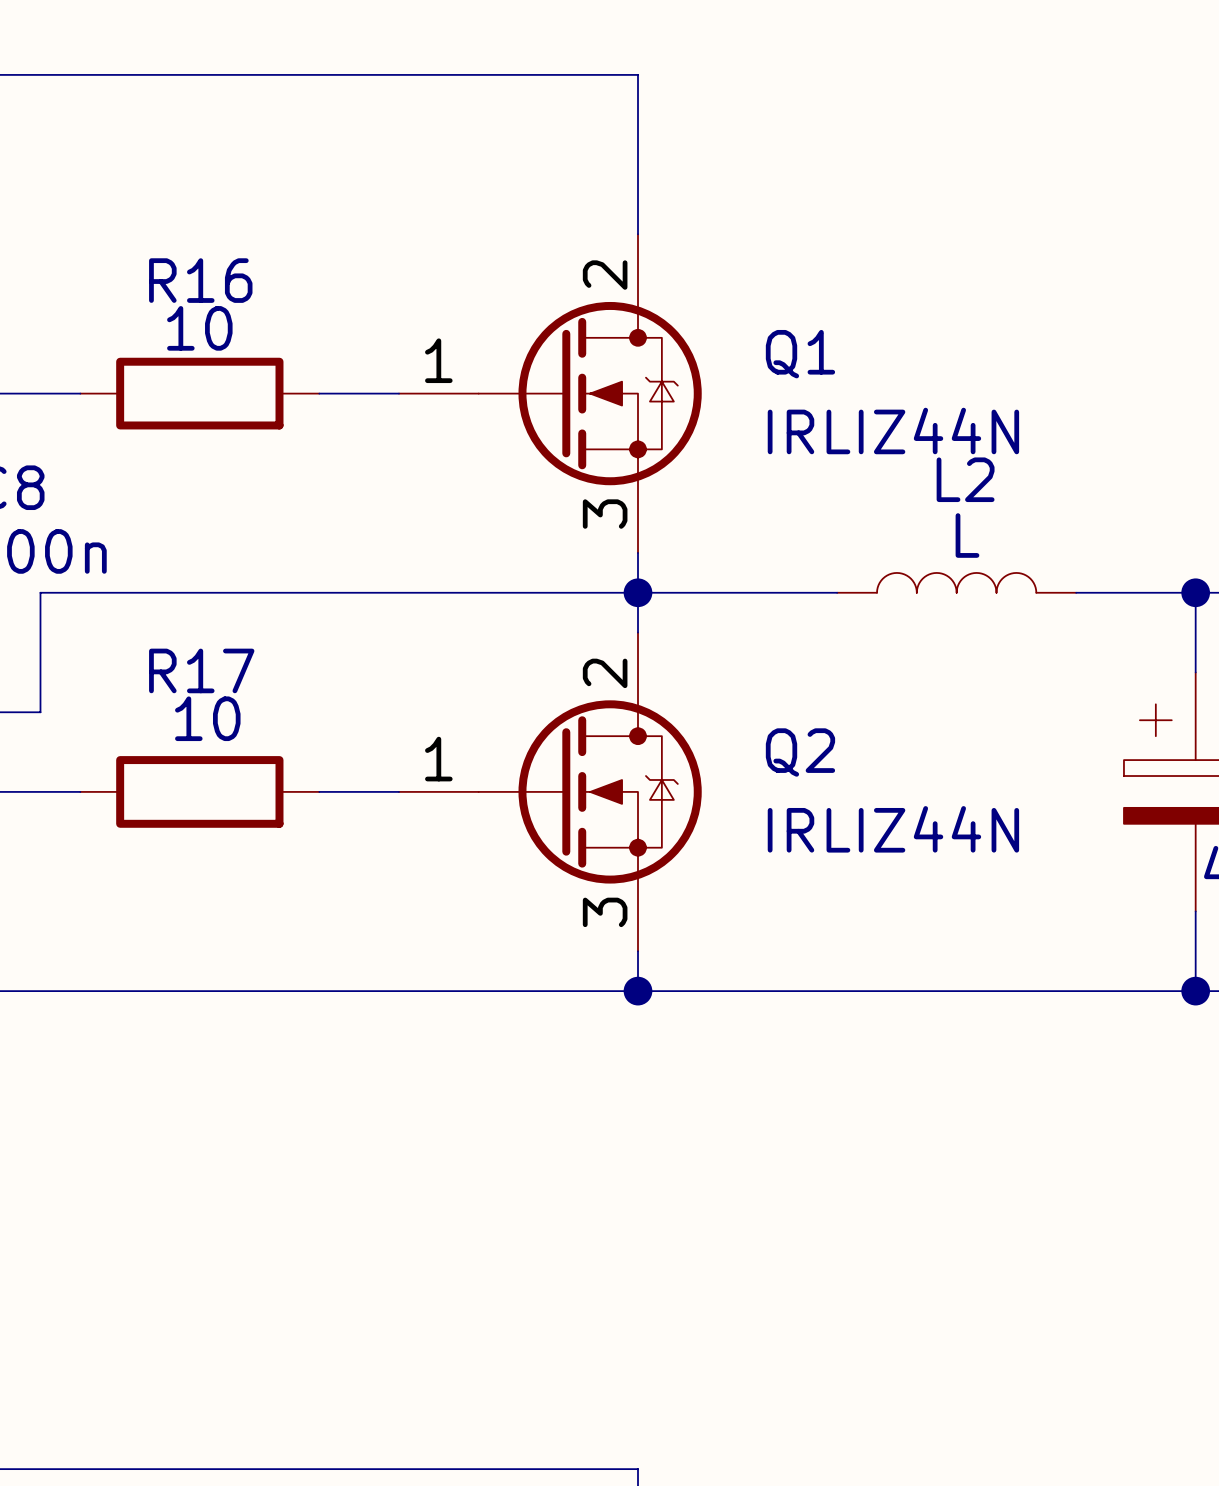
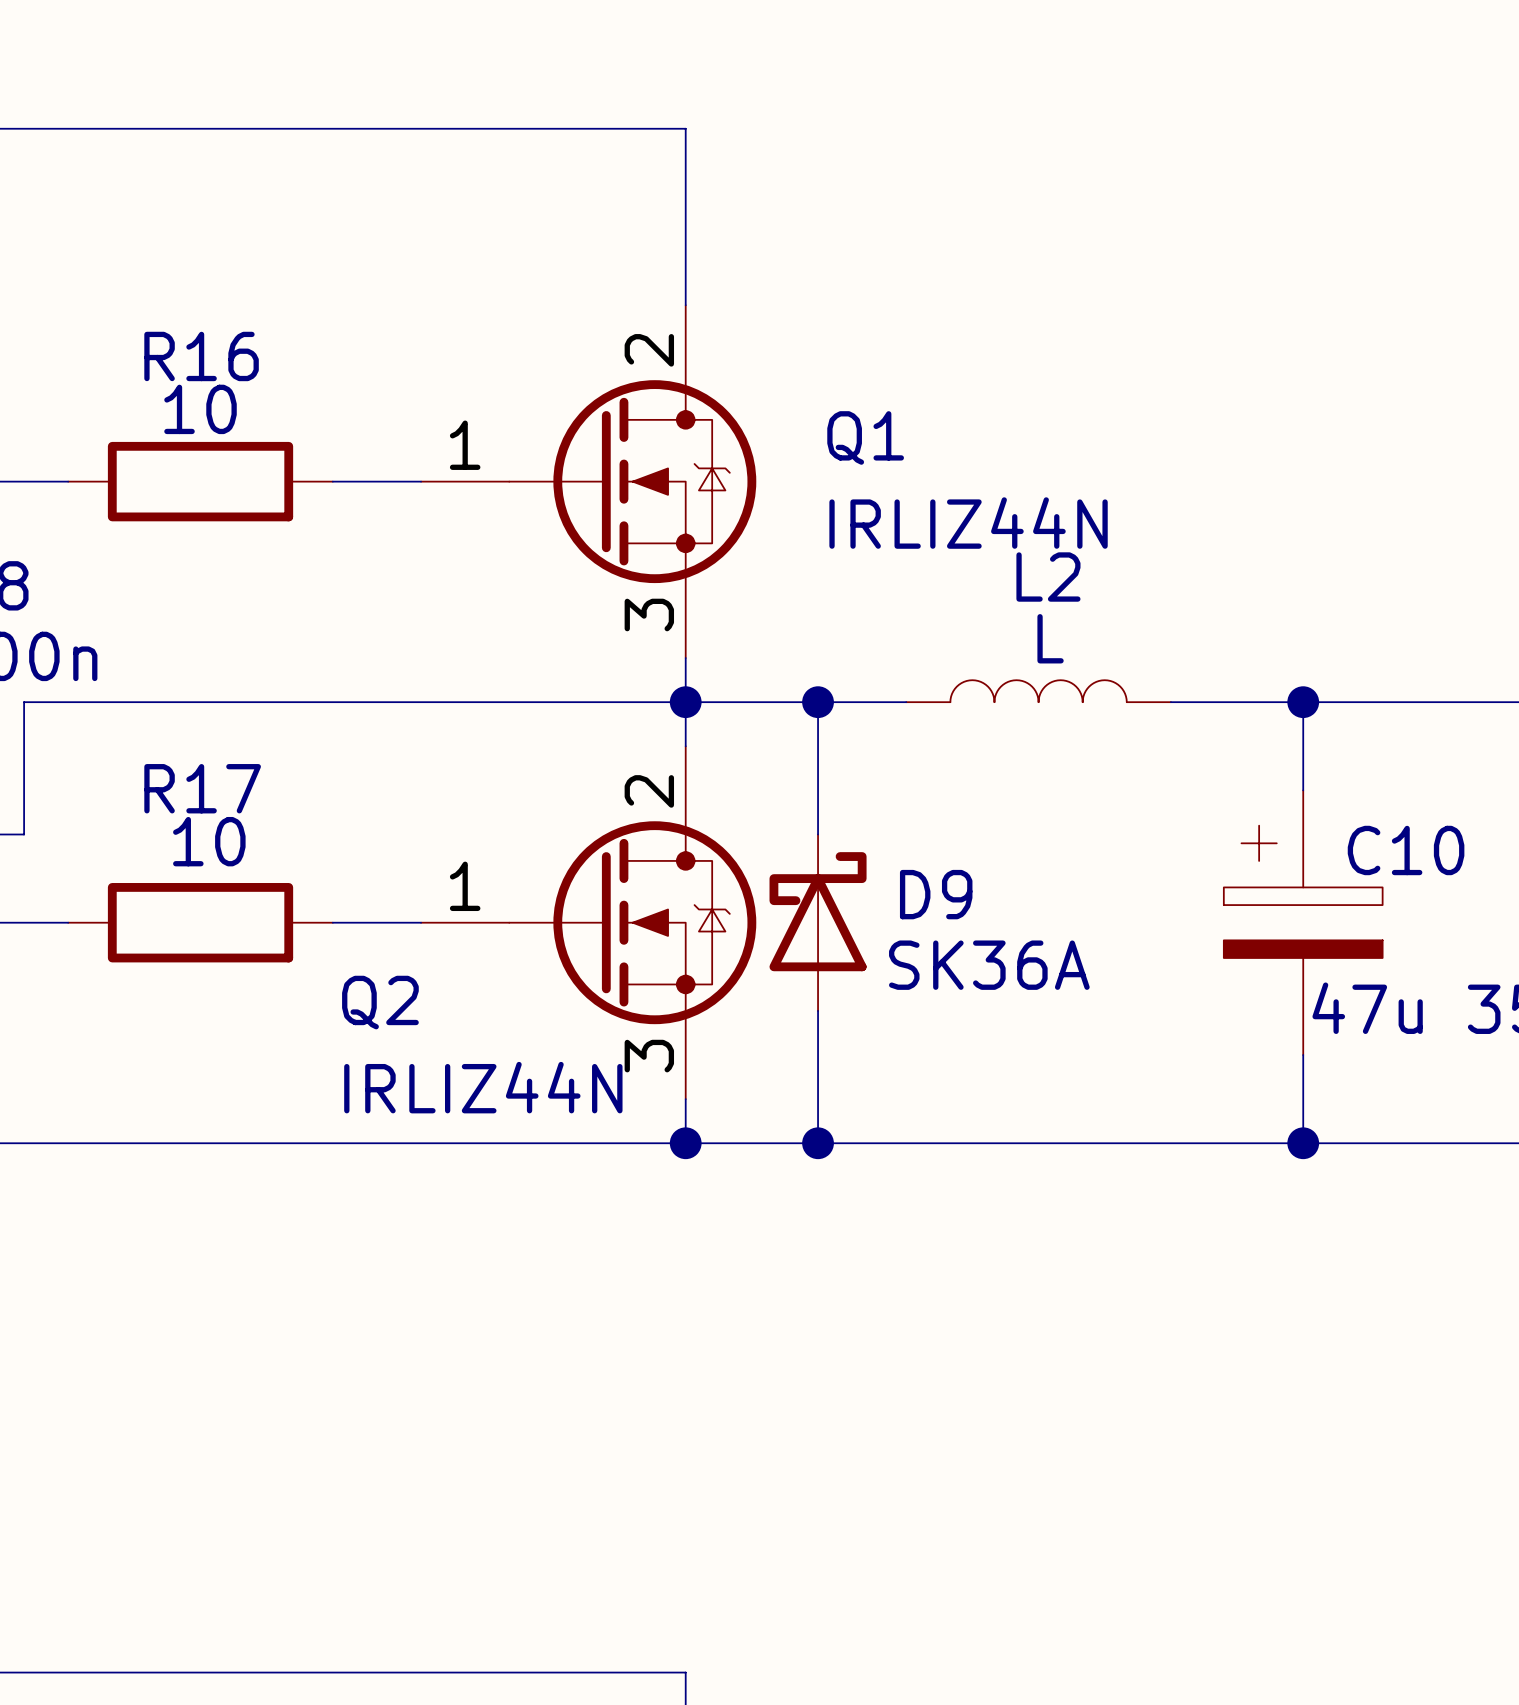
wire: none -> (818, 702) (818, 834)
junction: none -> (818, 702)
Q2 name position: Q2 (800, 752) -> Q2 (380, 1002)
D9: none -> SK36A (818, 922)
Q2 value position: IRLIZ44N (893, 829) -> IRLIZ44N (483, 1087)
wire: none -> (818, 1010) (818, 1143)
junction: none -> (818, 1143)

